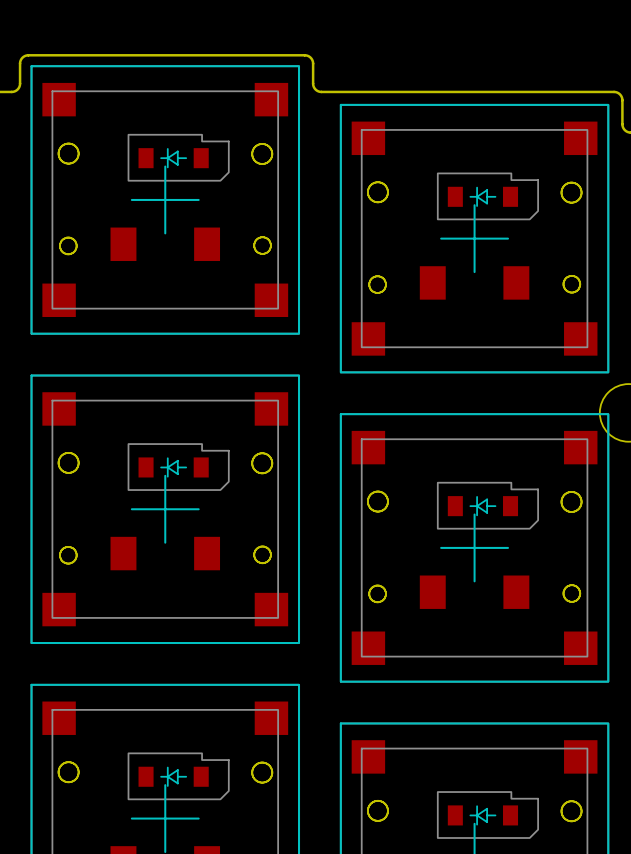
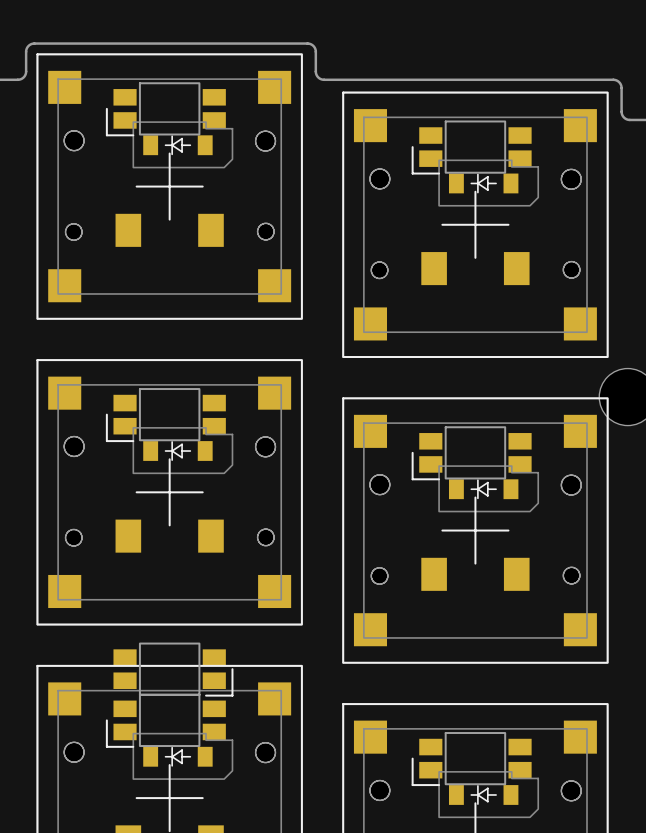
part: none -> (165, 109)
part: none -> (471, 147)
part: none -> (165, 415)
part: none -> (471, 453)
part: none -> (173, 669)
part: none -> (165, 720)
part: none -> (471, 759)

